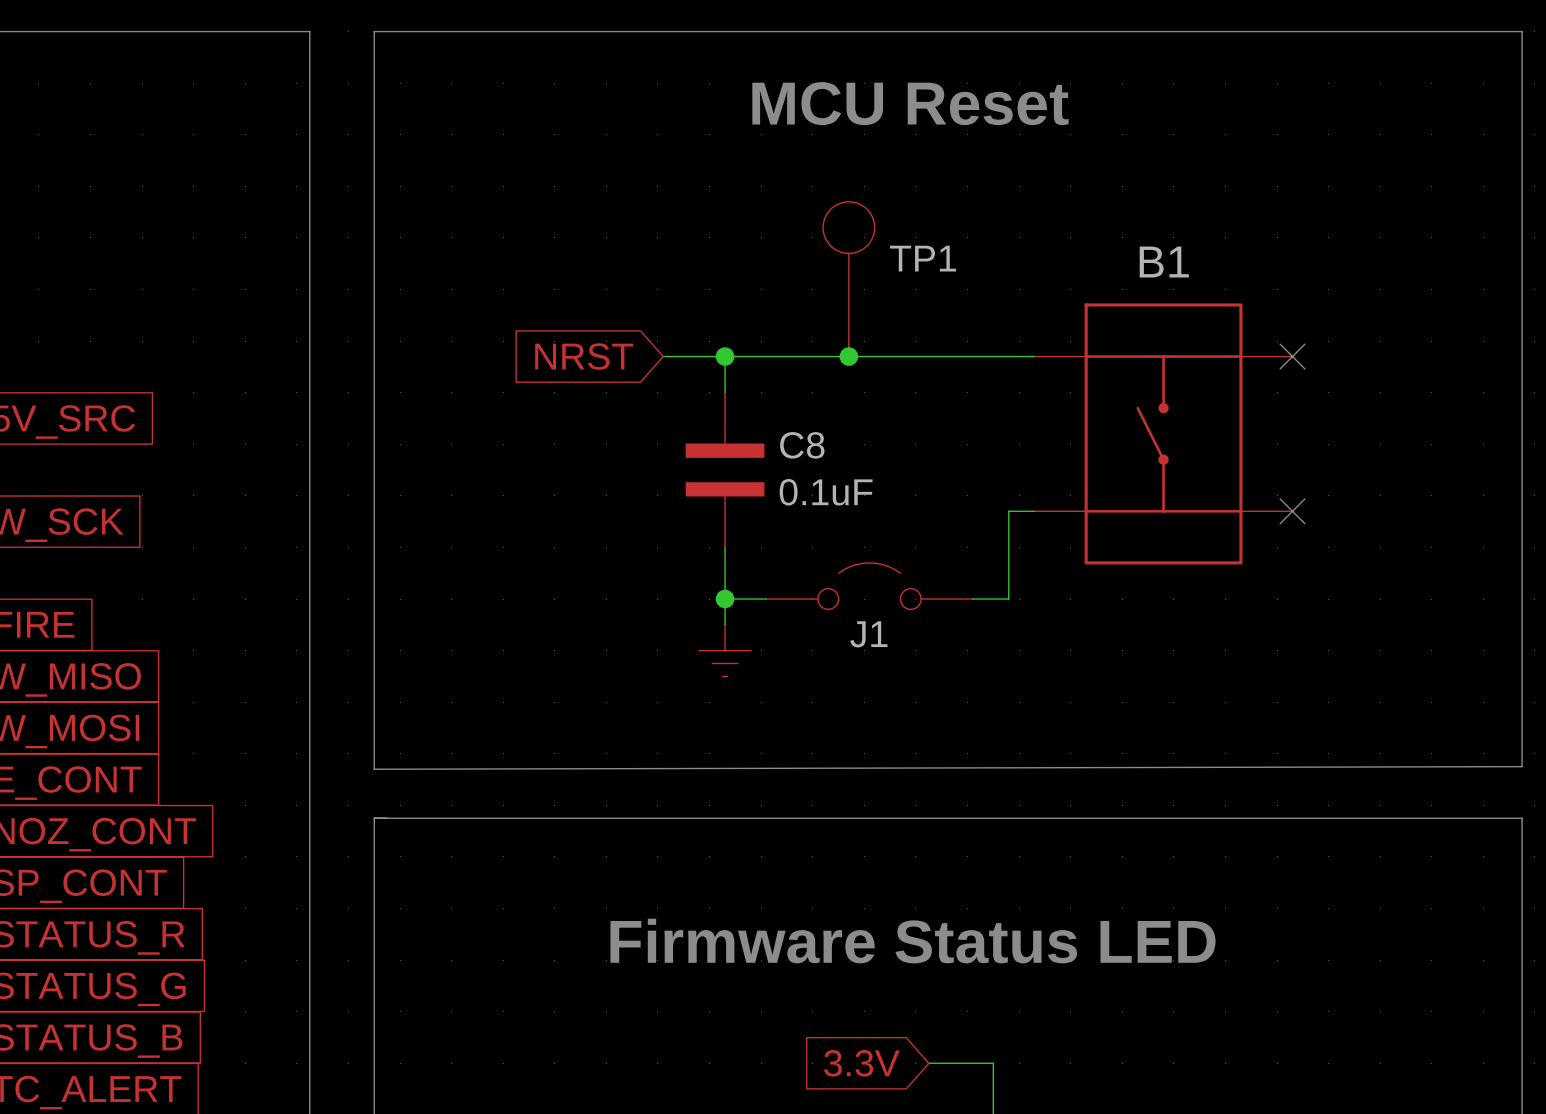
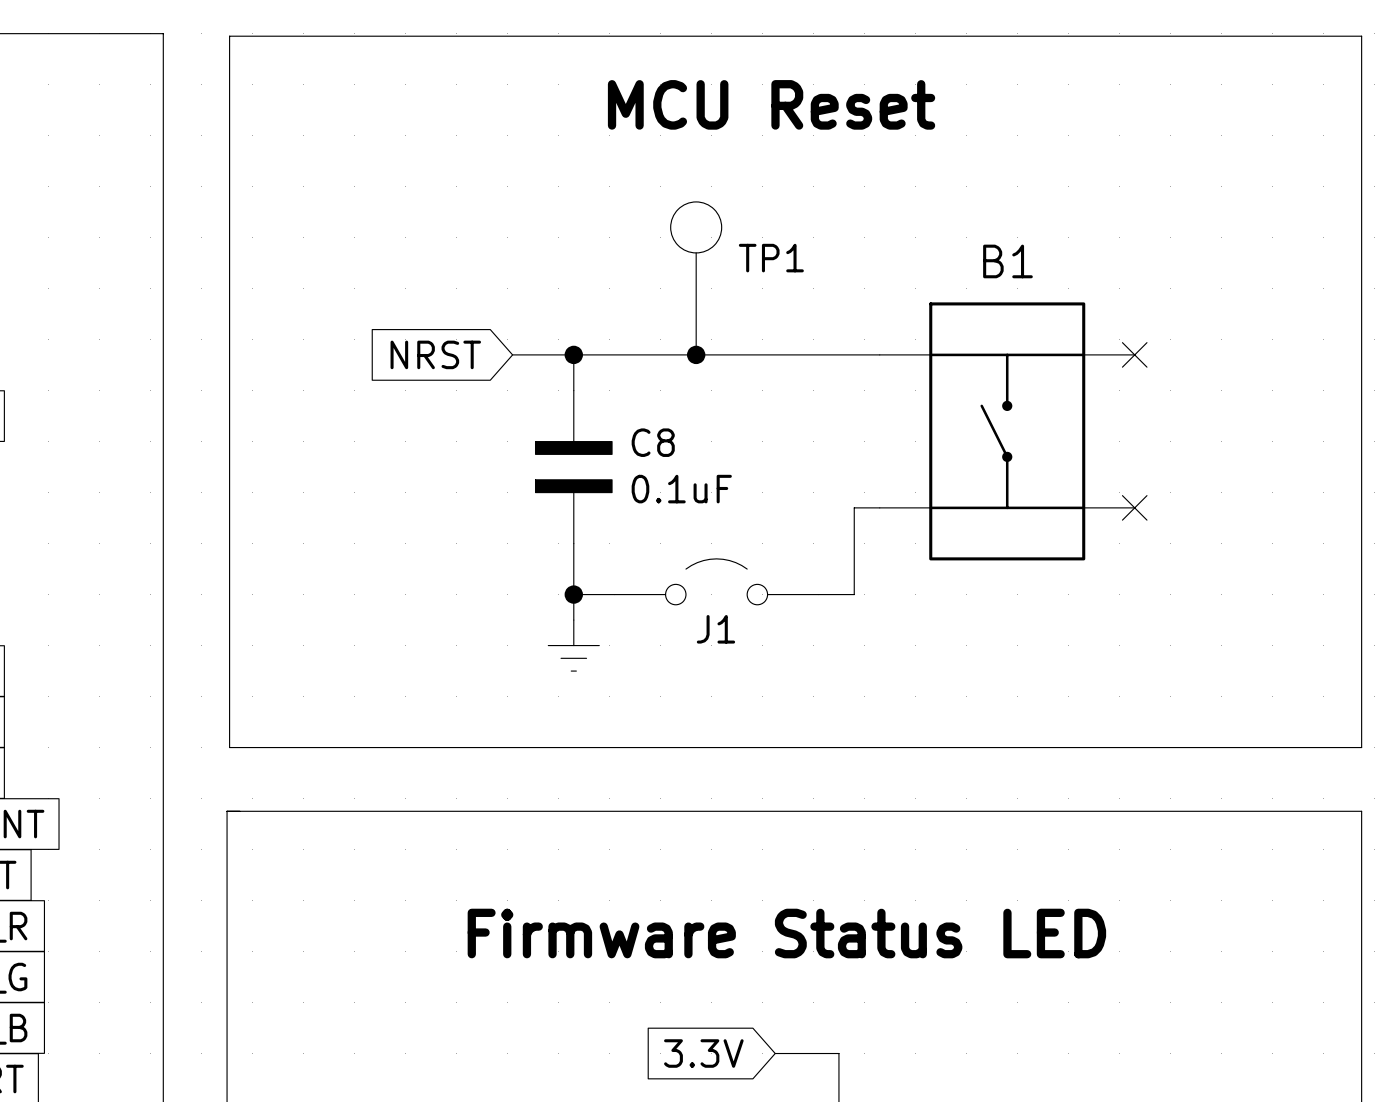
line: (1522, 34) (1522, 31) (374, 31) (374, 769) (1522, 766) (1522, 753) -> (1361, 36) (229, 36) (229, 747) (1361, 747)

